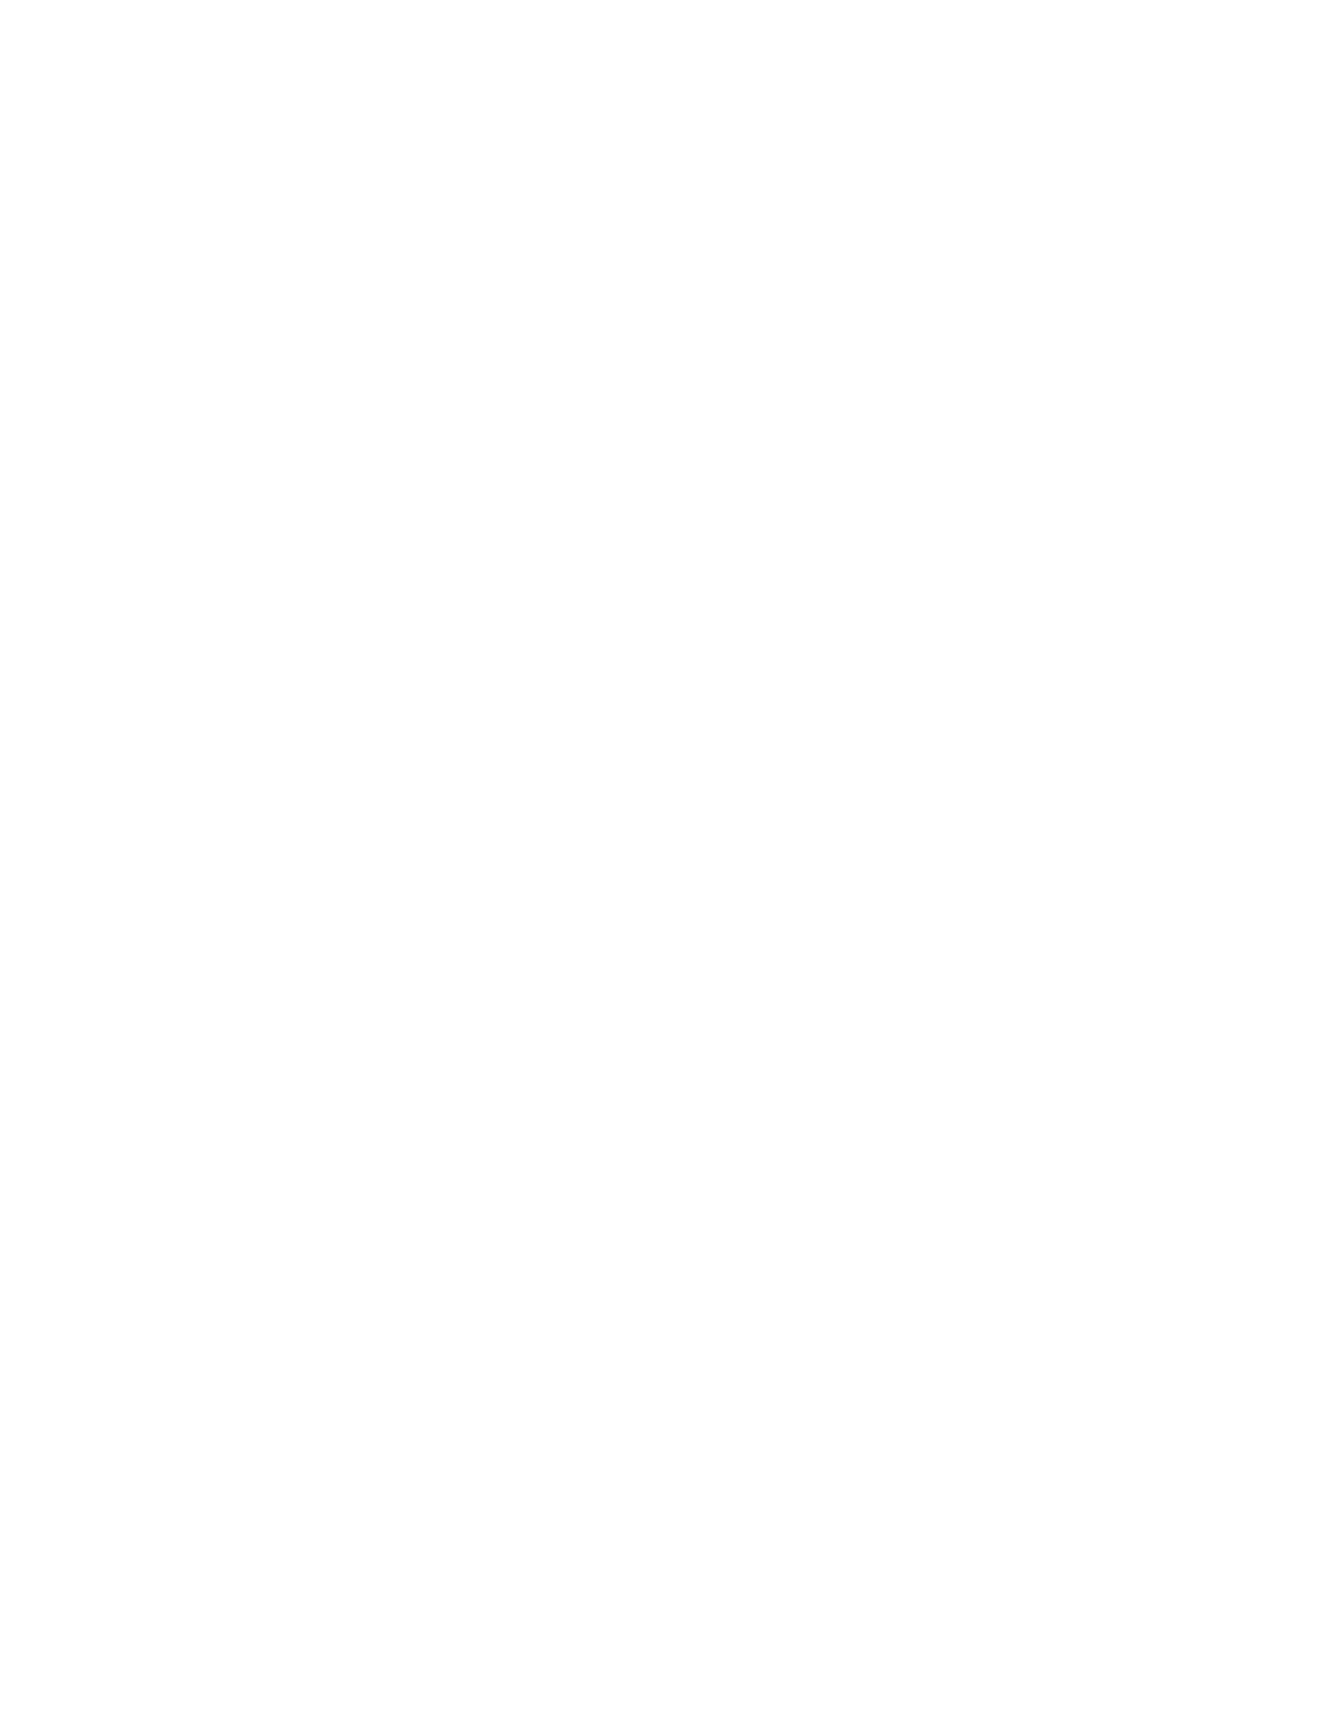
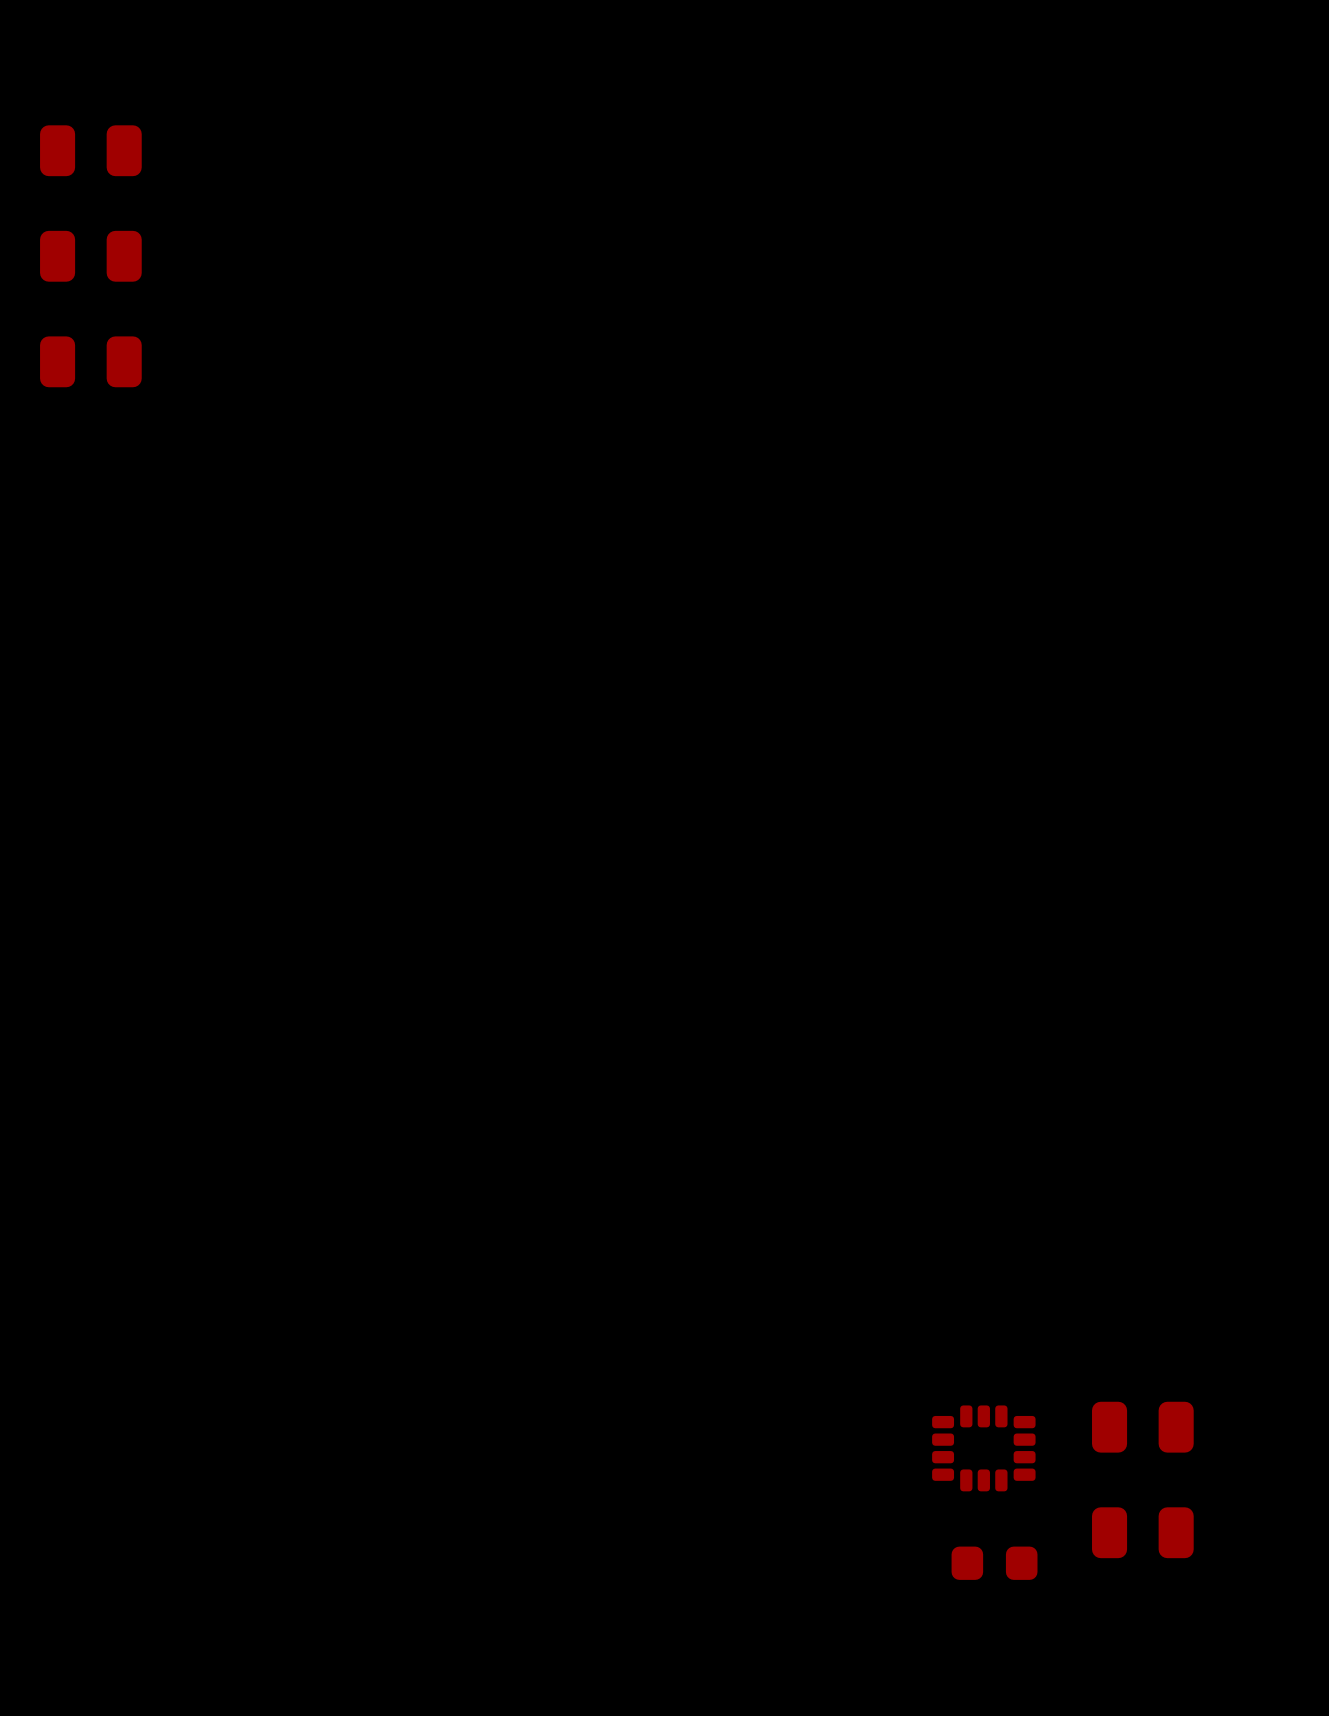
part: none -> (90, 150)
part: none -> (90, 256)
part: none -> (90, 361)
part: none -> (1142, 1427)
part: none -> (983, 1448)
part: none -> (1142, 1532)
part: none -> (994, 1563)

